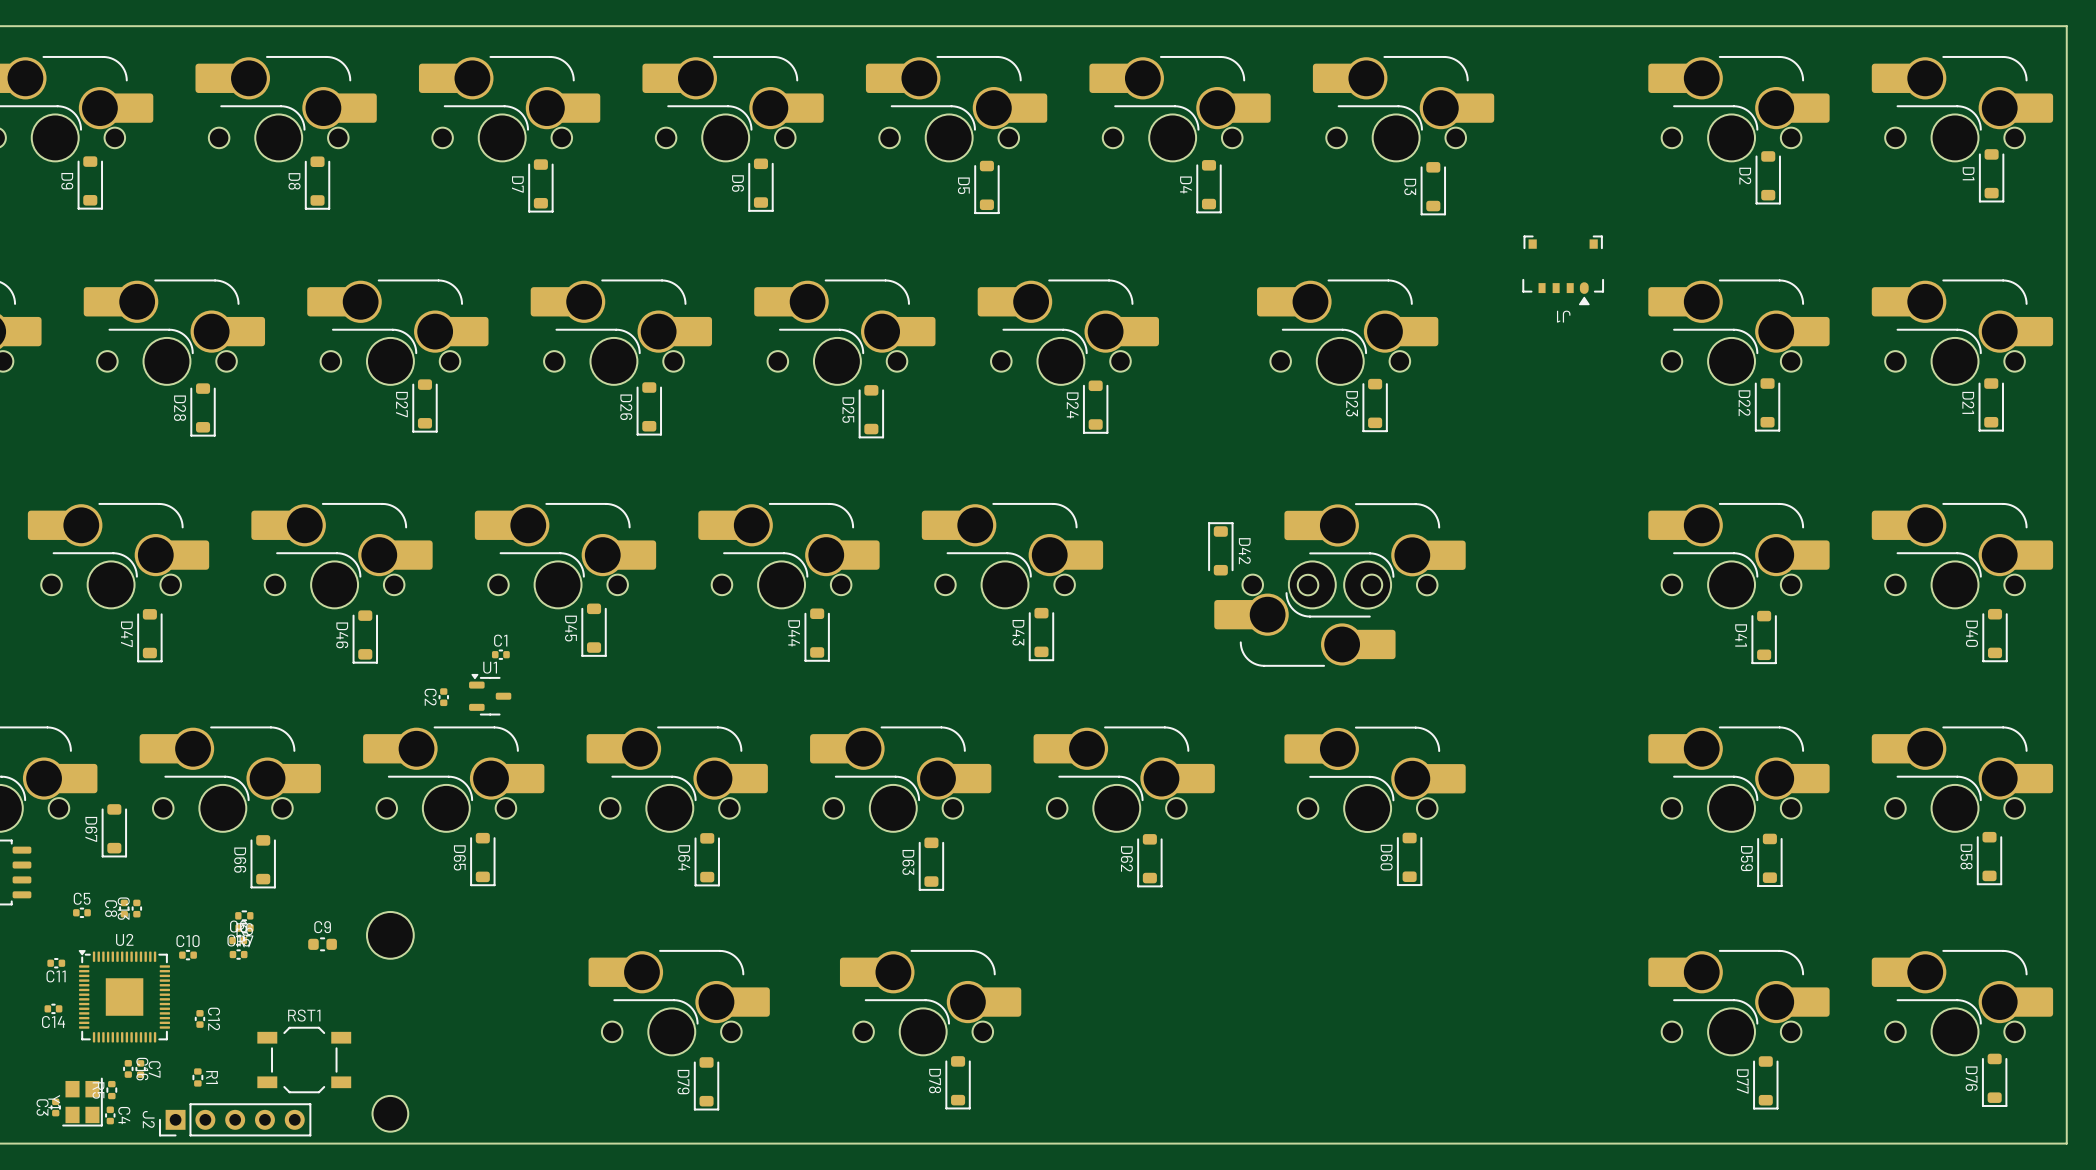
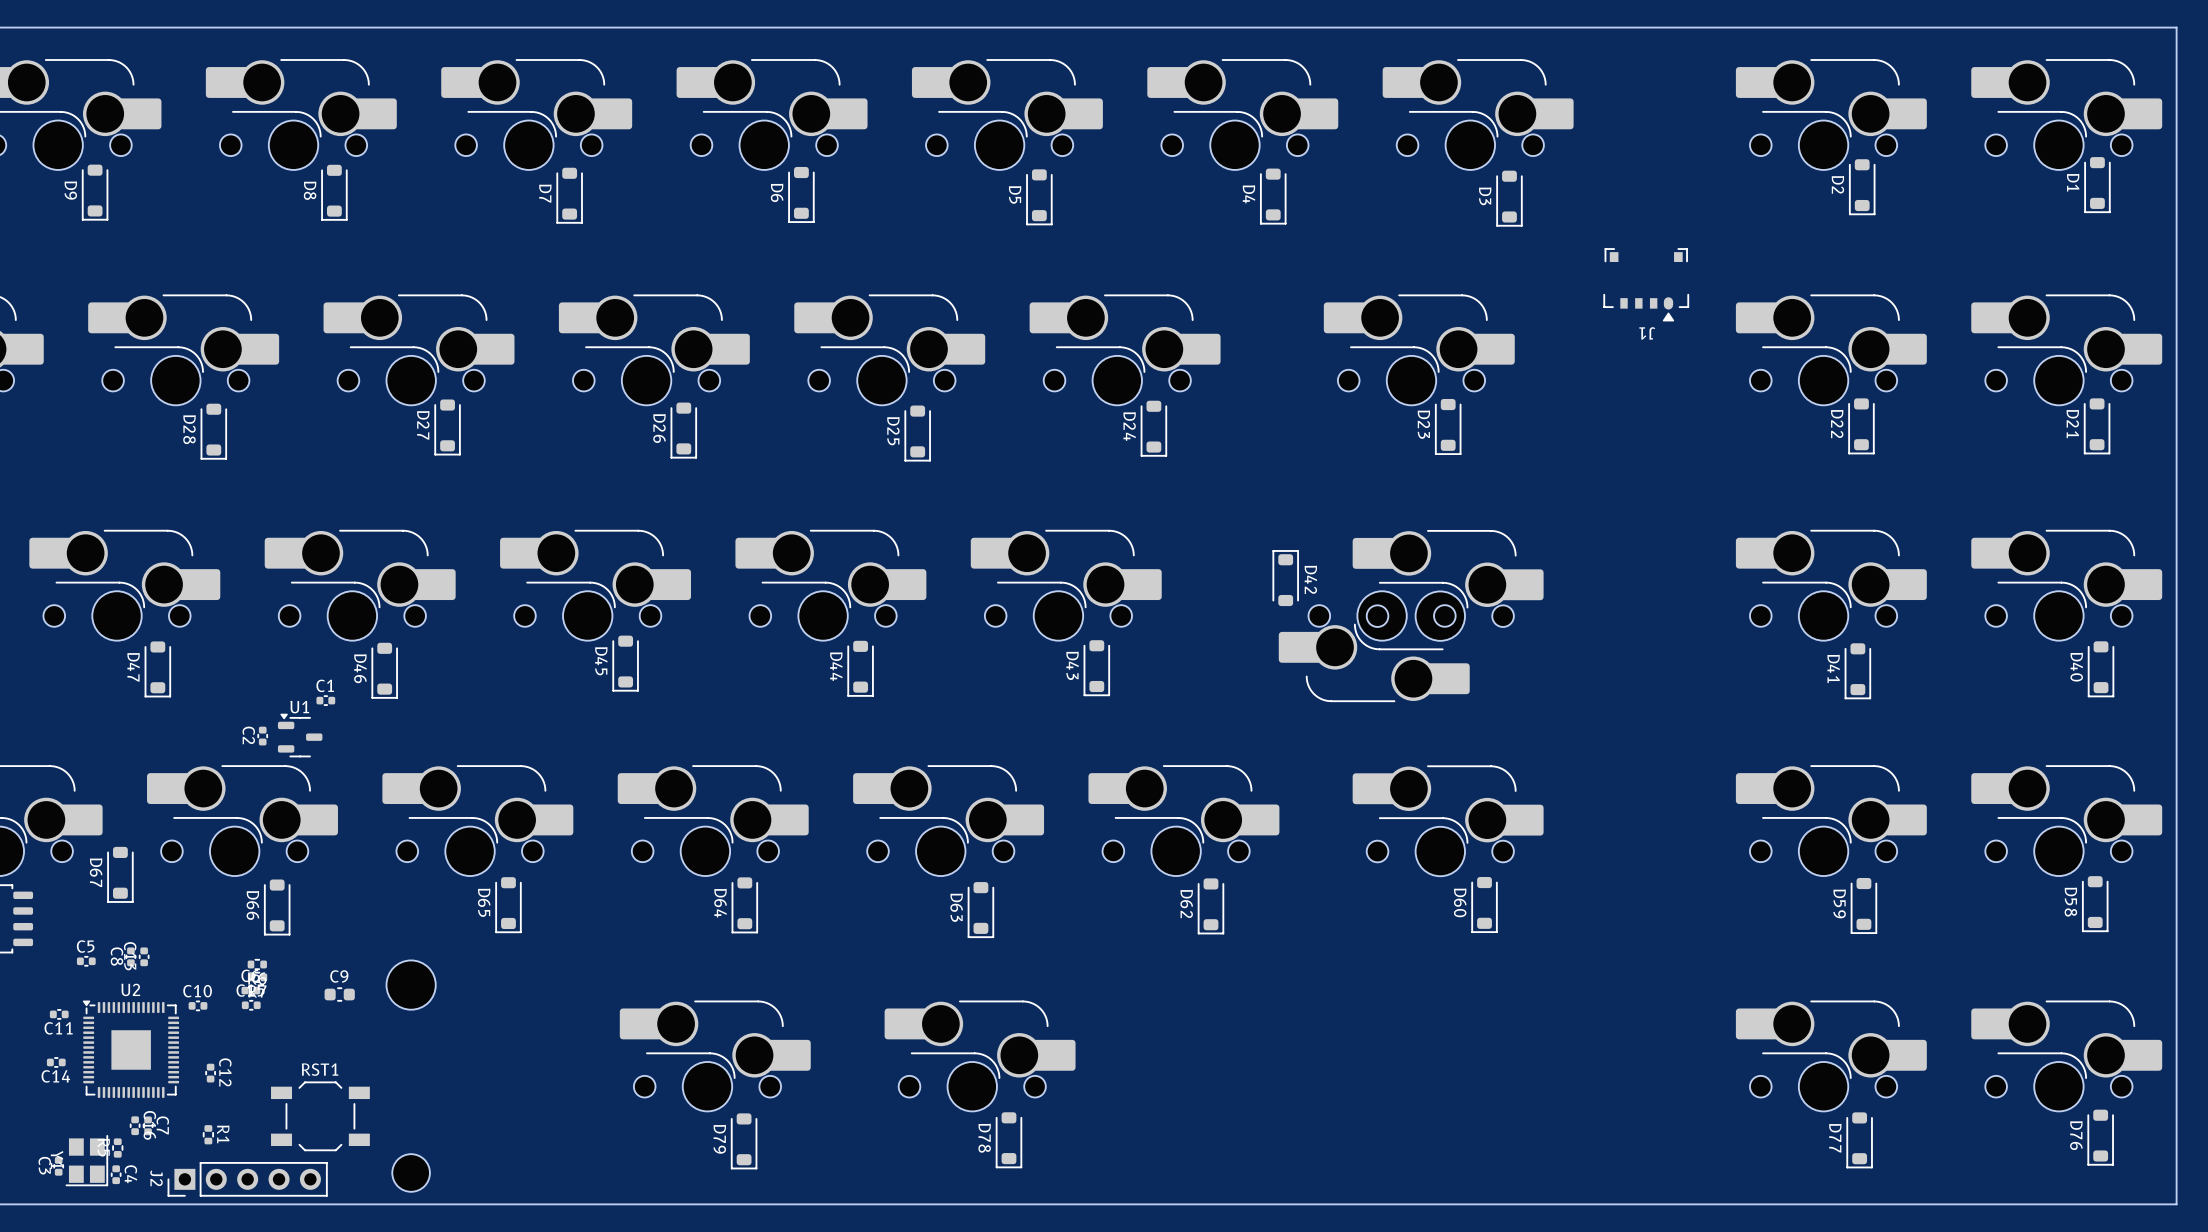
C1 position: (500, 654) -> (325, 700)
U1 position: (490, 694) -> (300, 735)
C2 position: (443, 697) -> (262, 736)

